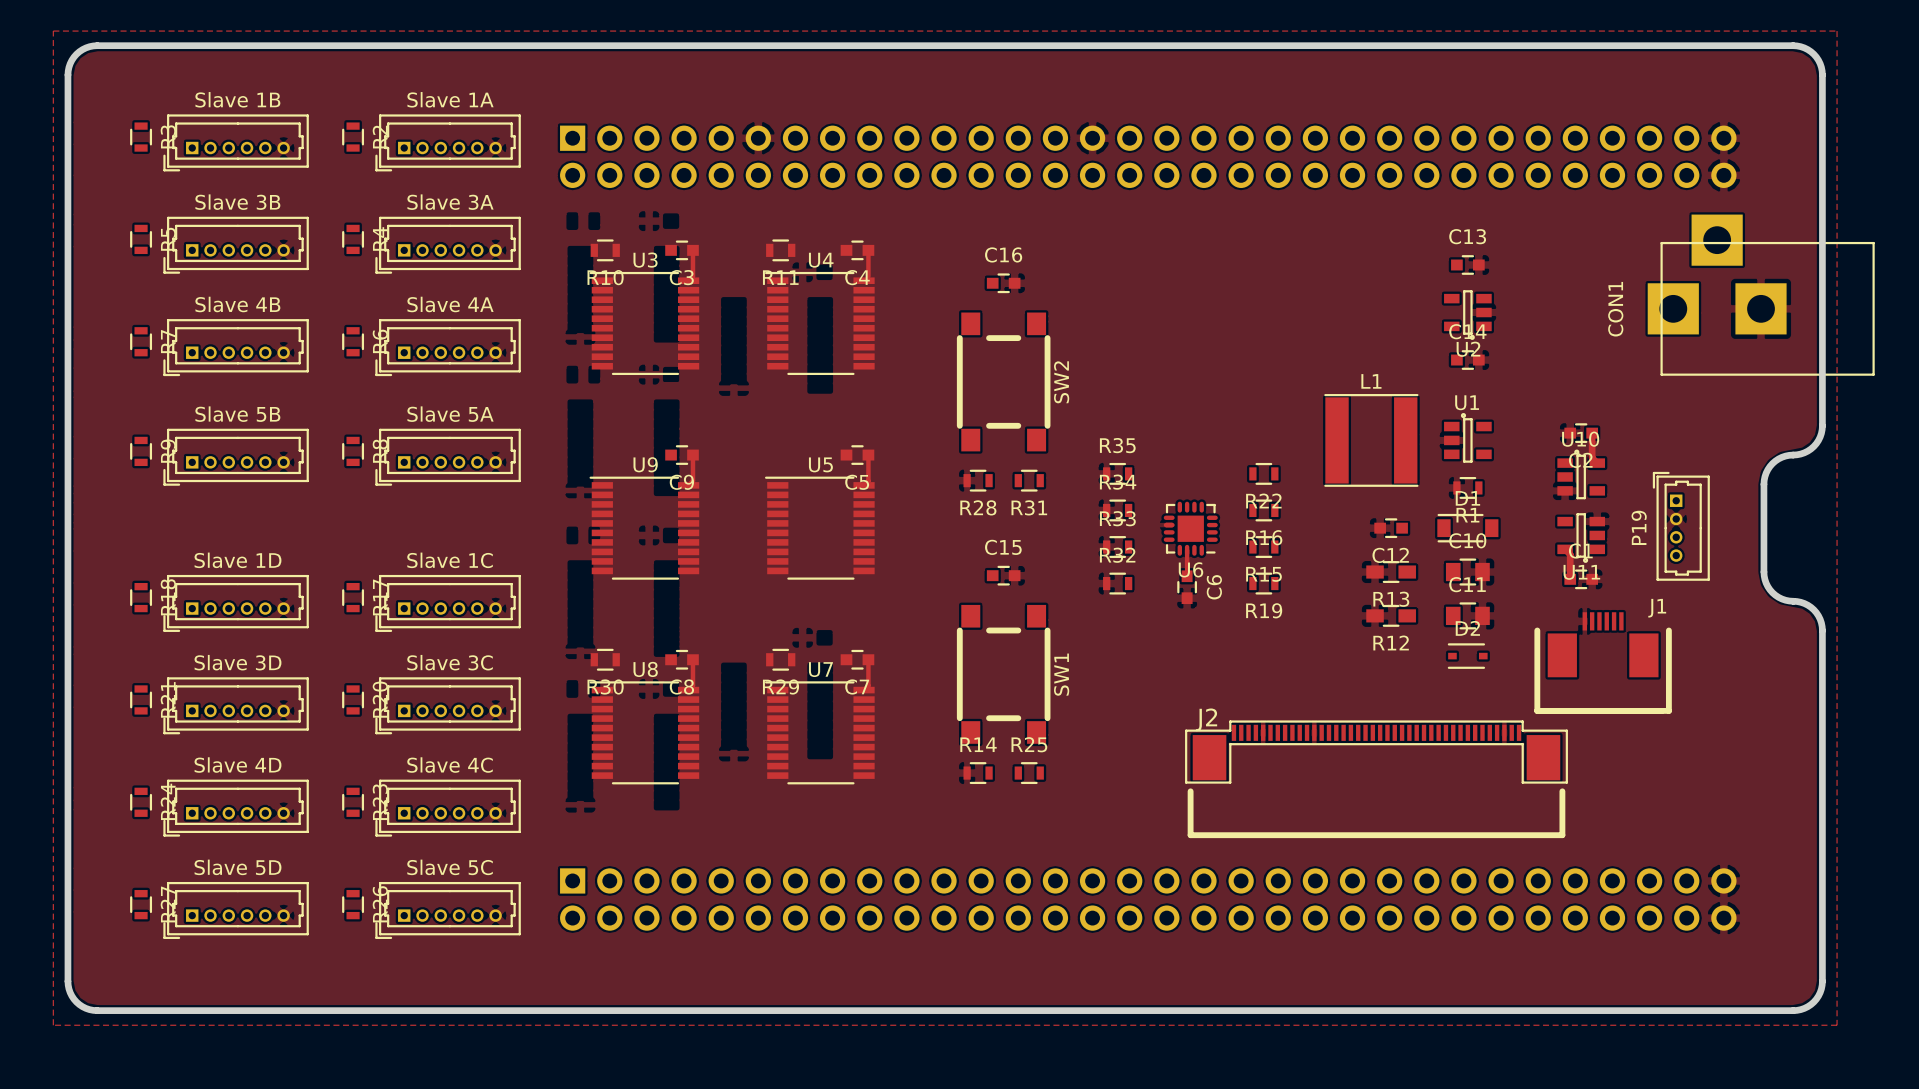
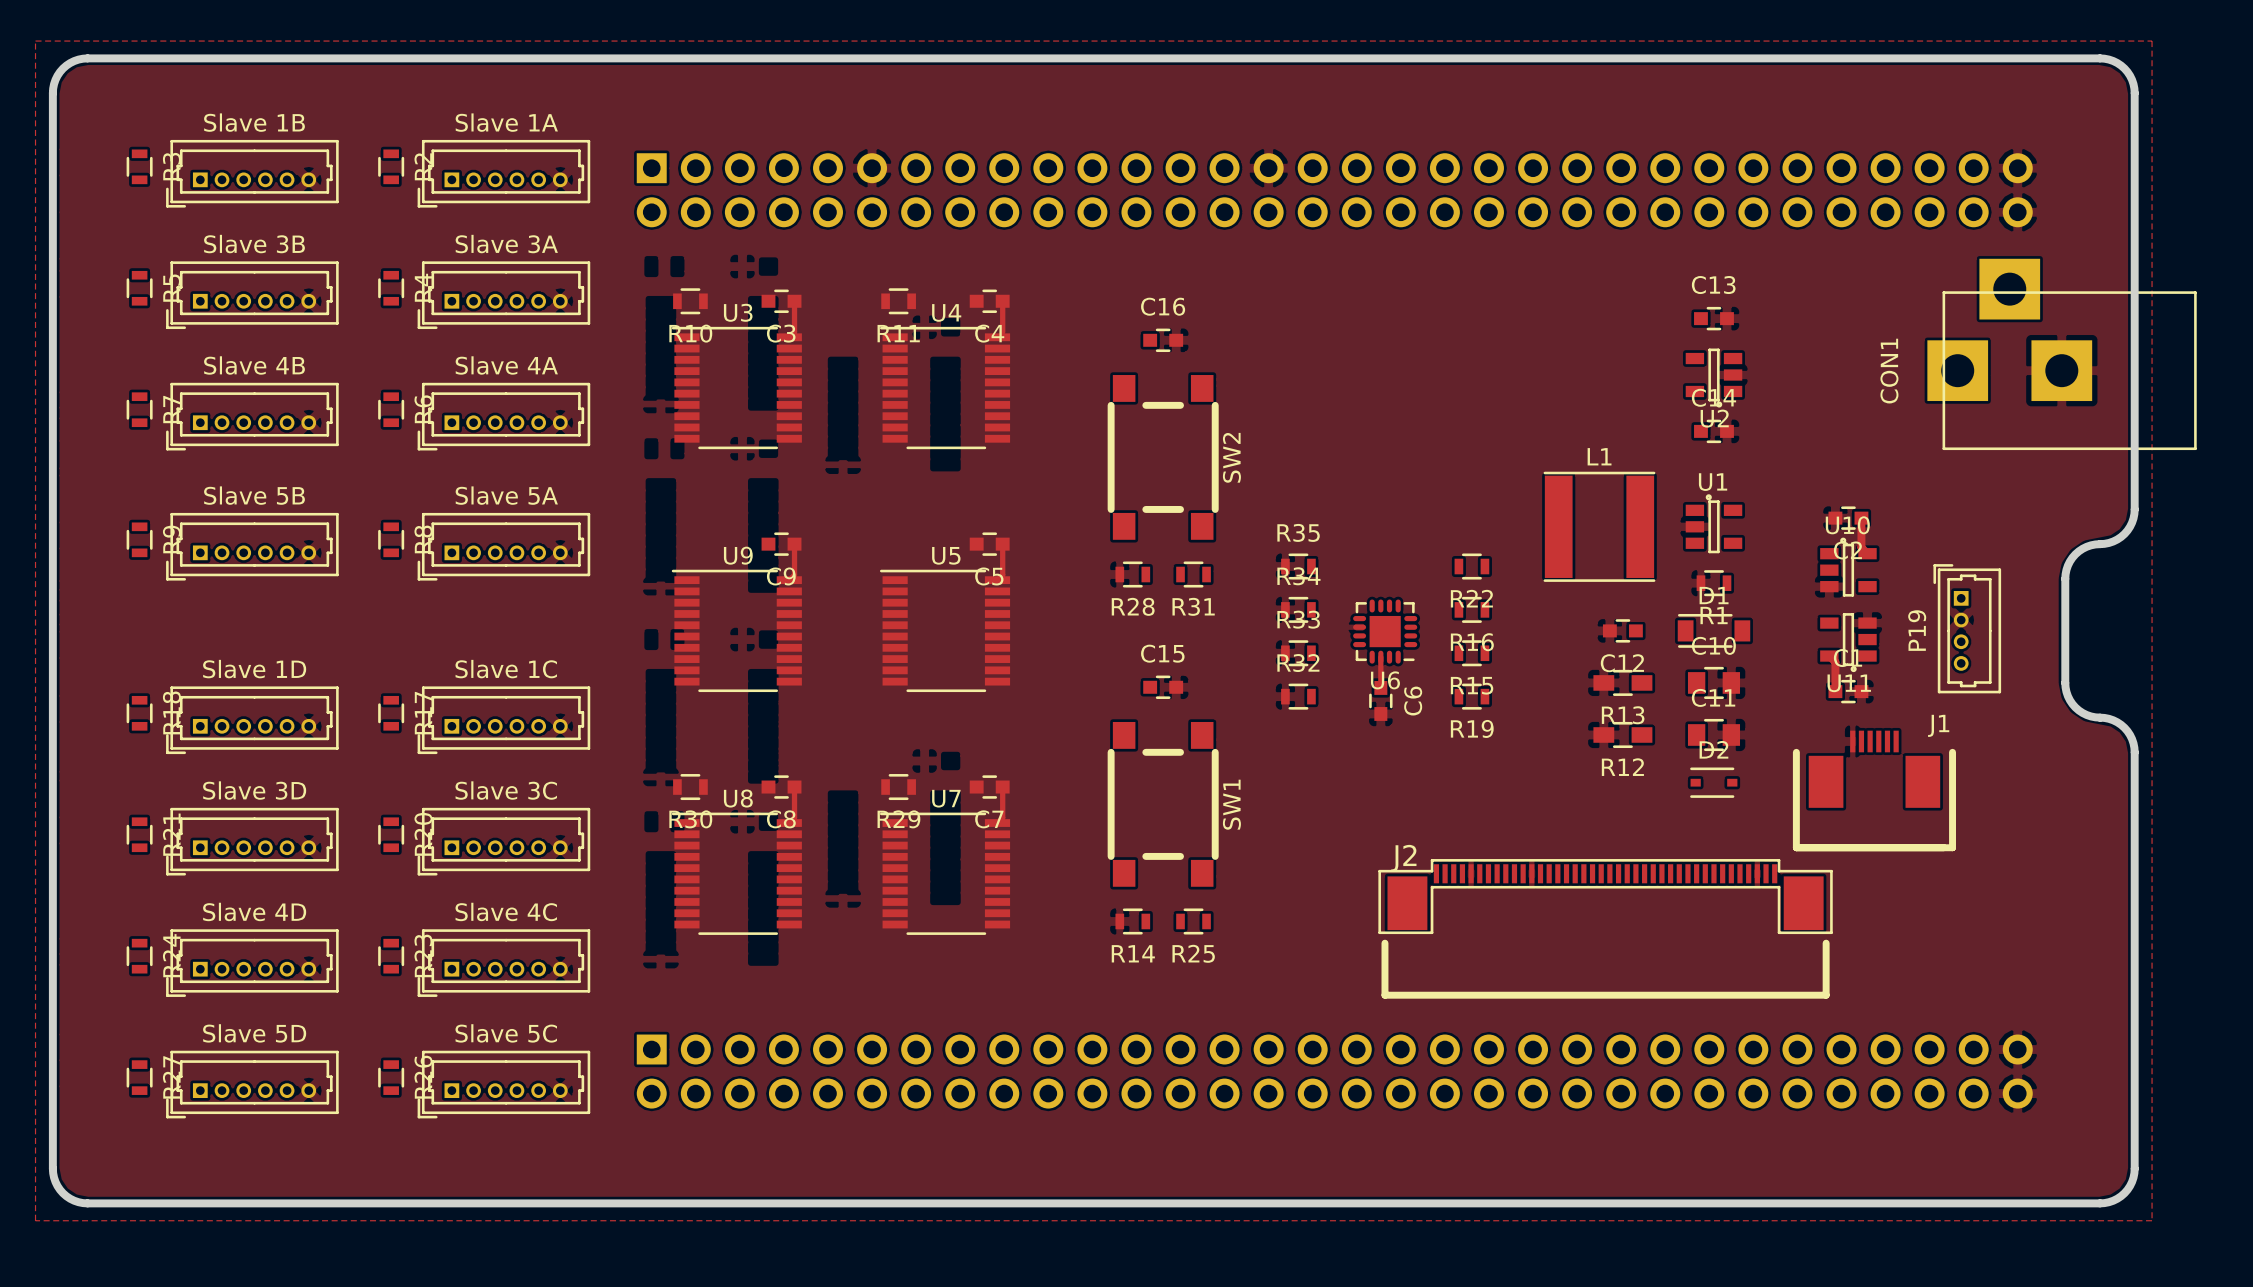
R14 name position: R14 (978, 744) -> R14 (1133, 953)
R25 name position: R25 (1029, 744) -> R25 (1193, 953)

